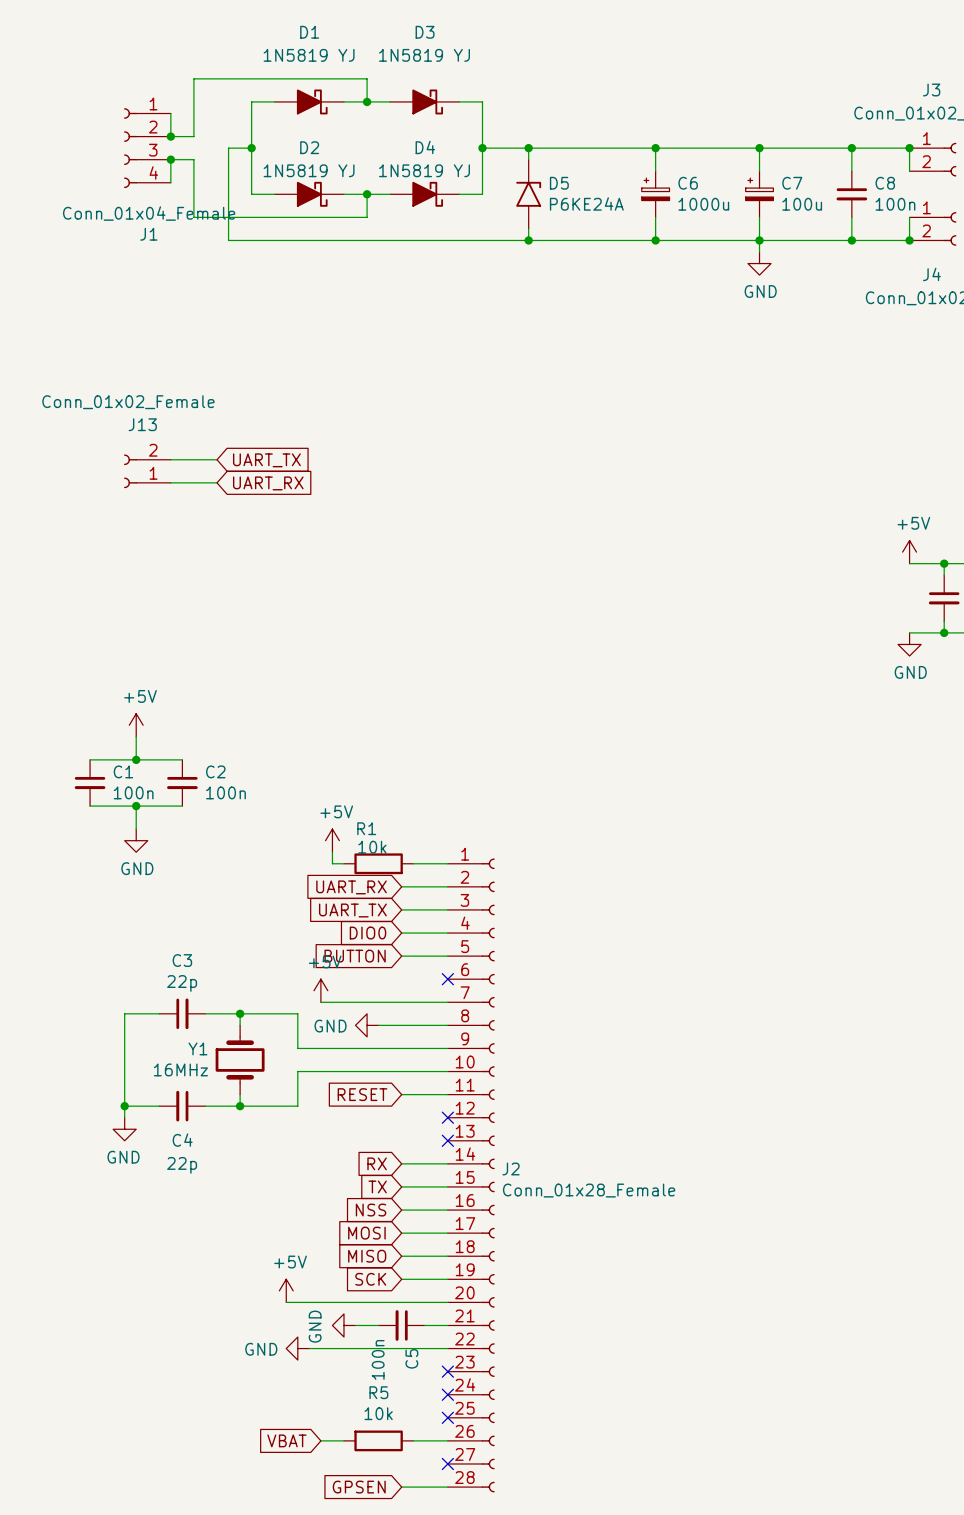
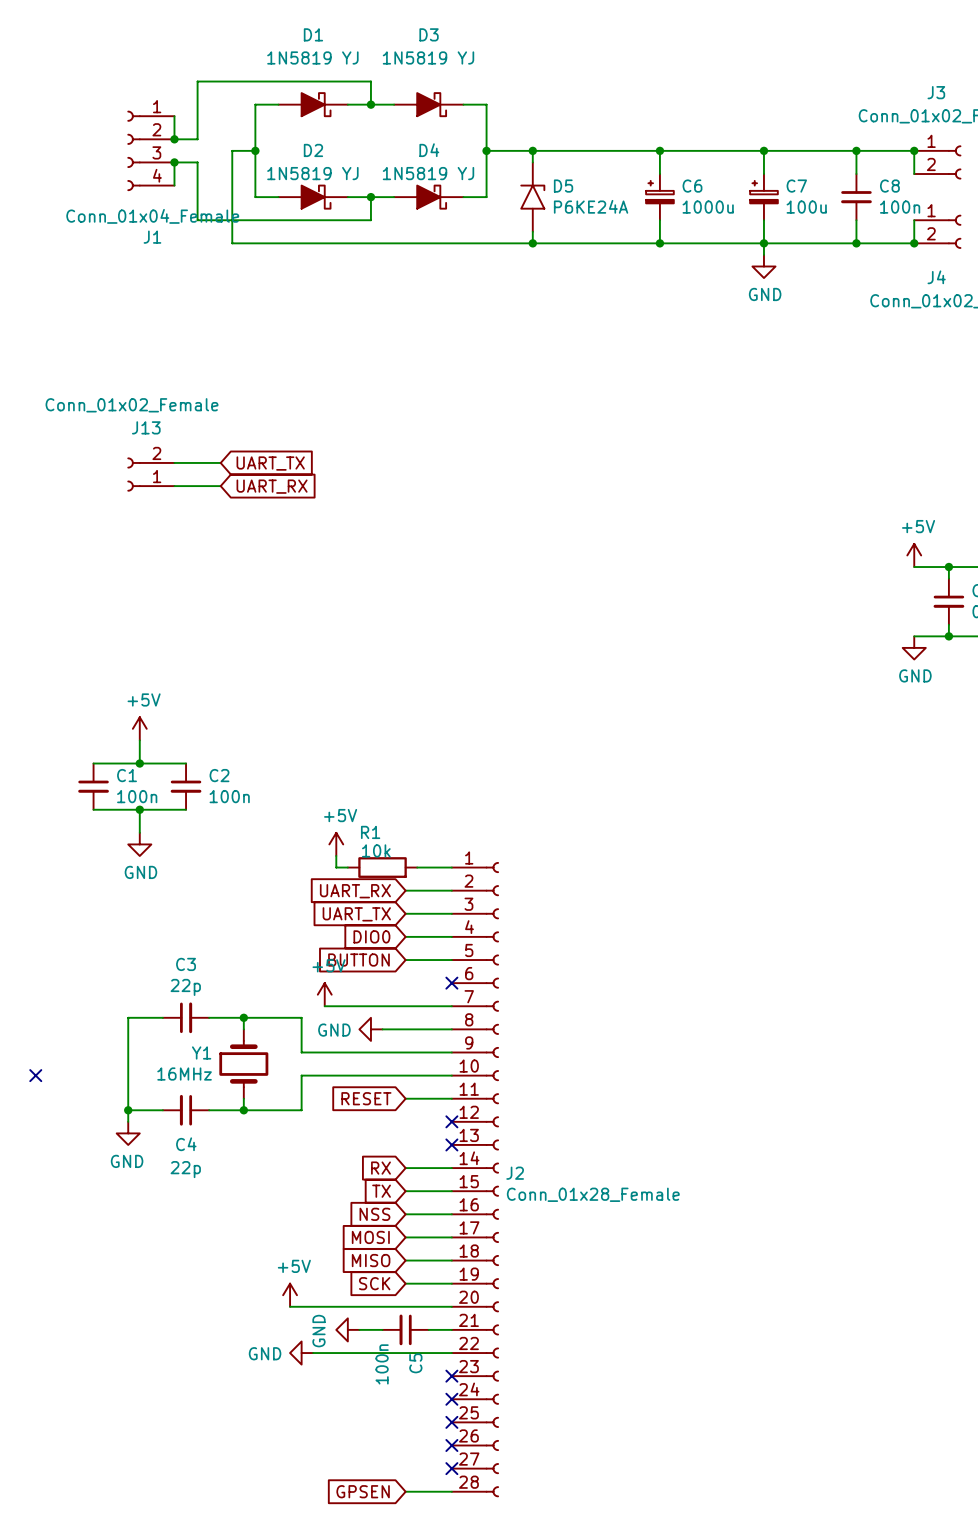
no-connect mark: none -> (35, 1075)
global label: VBAT (286, 1440) -> none
wire: (320, 1440) (343, 1440) -> none
R5: 10k (378, 1440) -> none
wire: (413, 1440) (447, 1440) -> none
no-connect mark: none -> (451, 1445)

